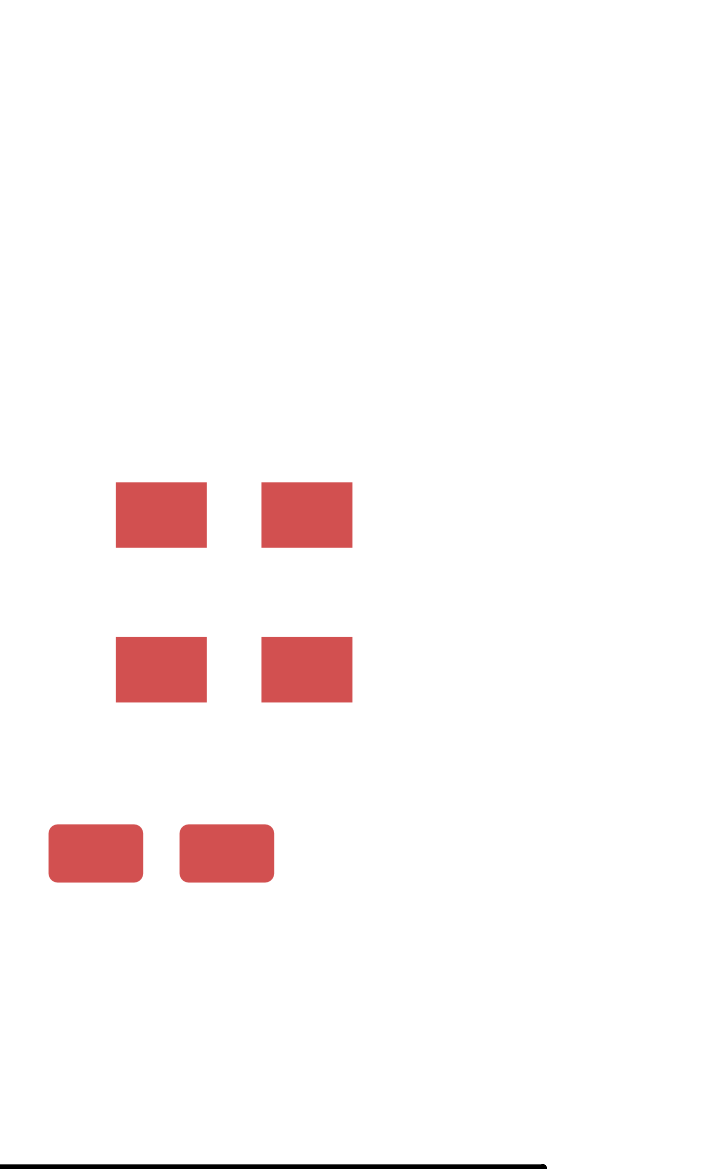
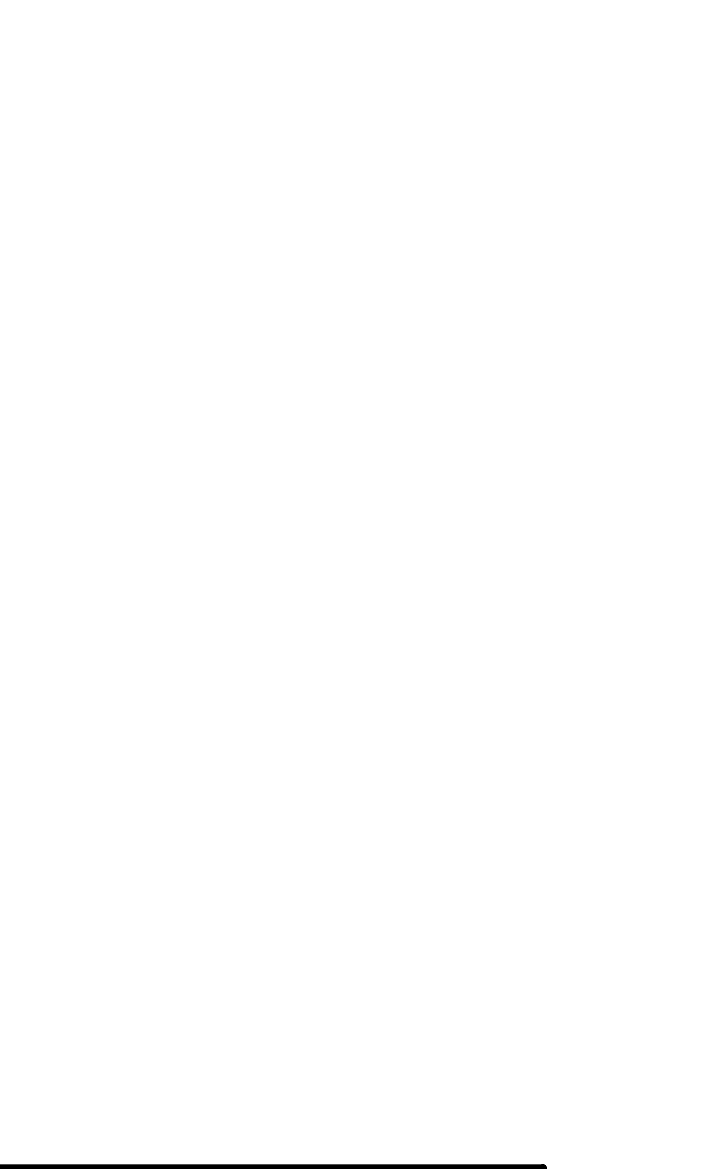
part: (234, 515) -> none
part: (234, 669) -> none
part: (161, 853) -> none

